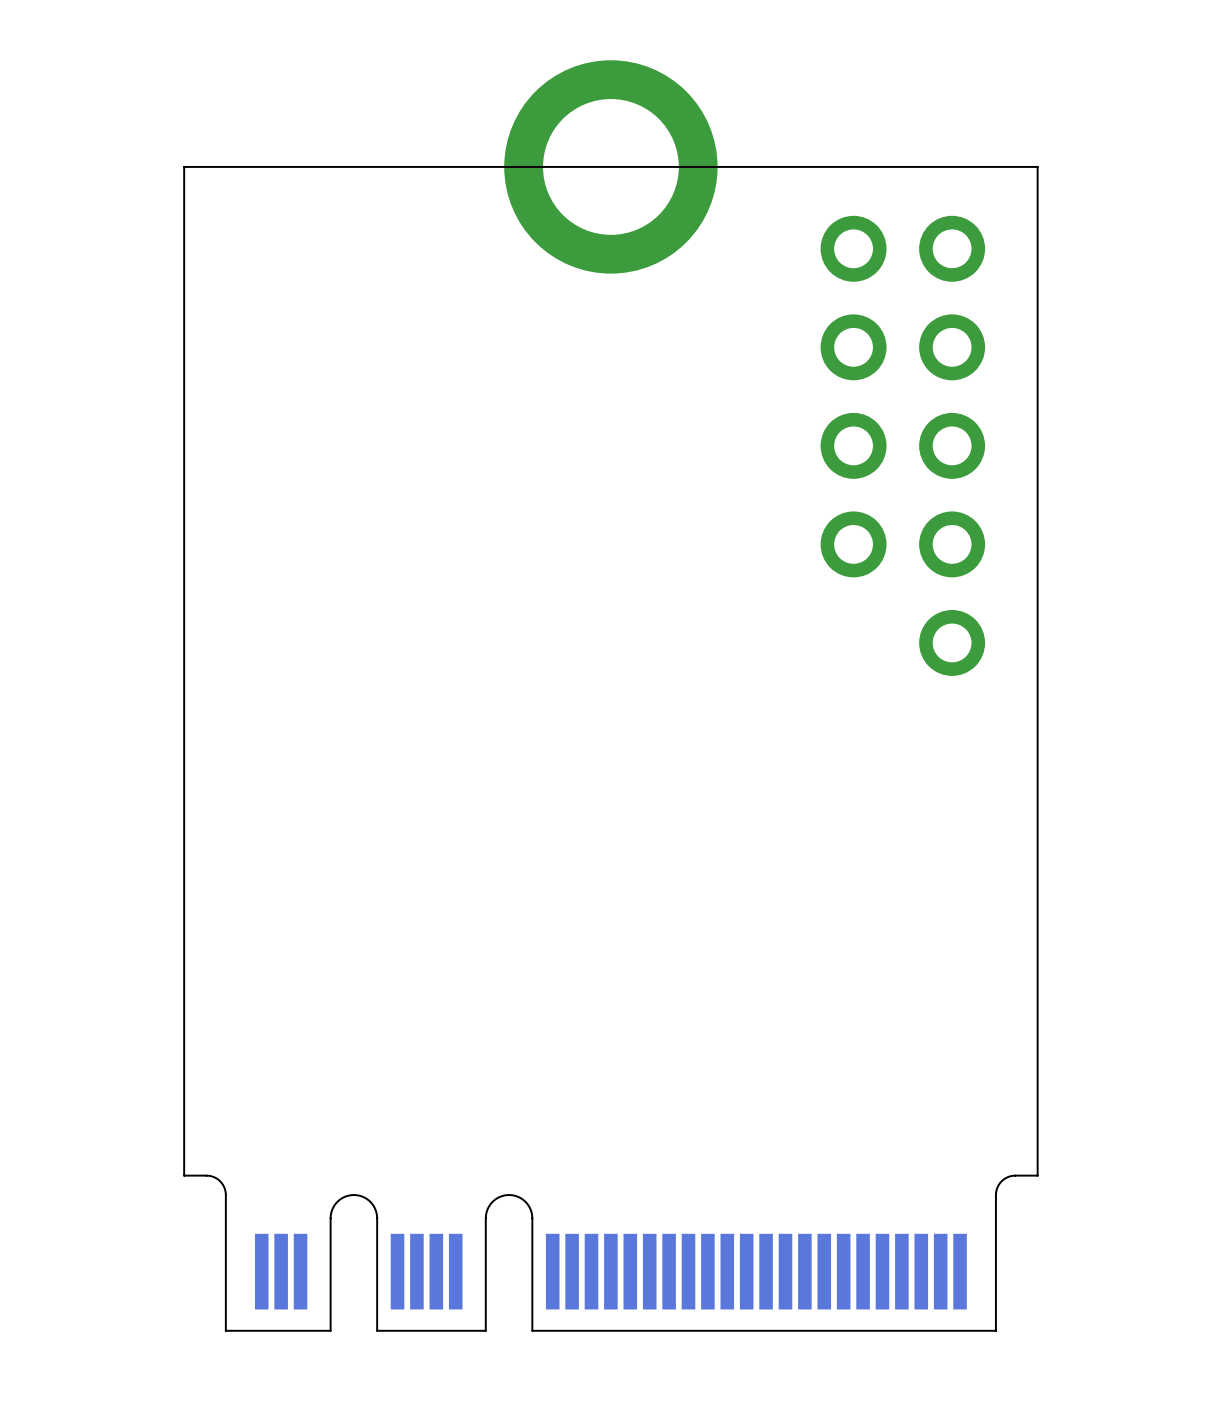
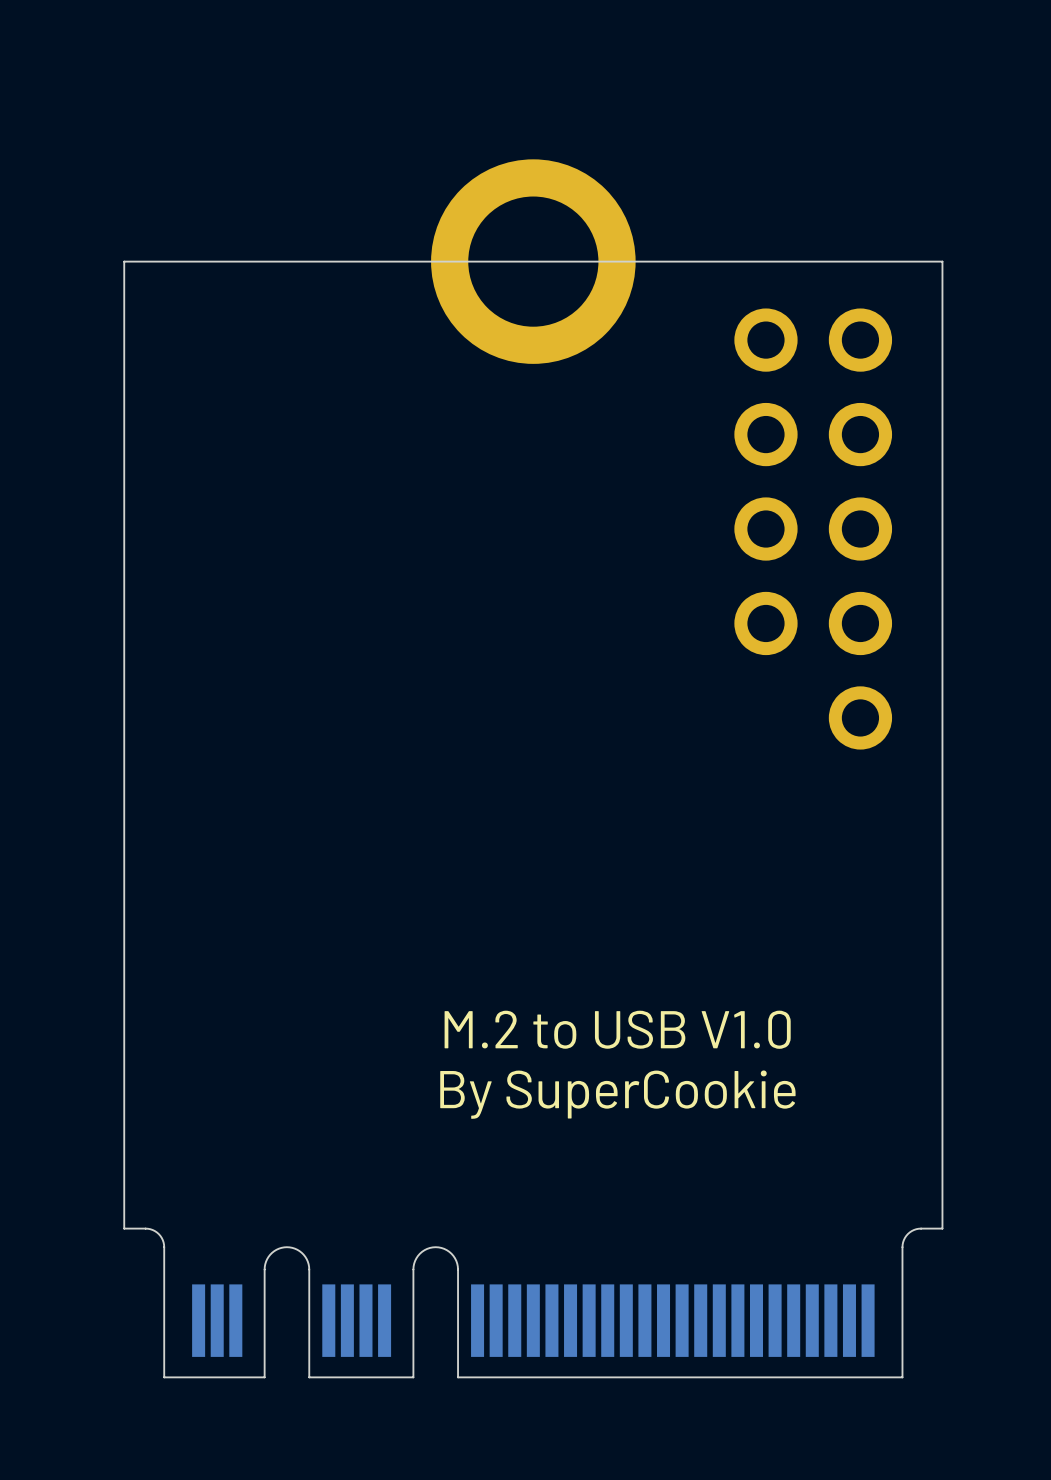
text: none -> M.2 to USB V1.0 (617, 1029)
text: none -> By SuperCookie (617, 1094)

